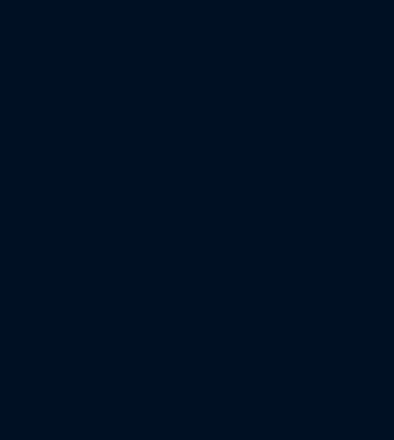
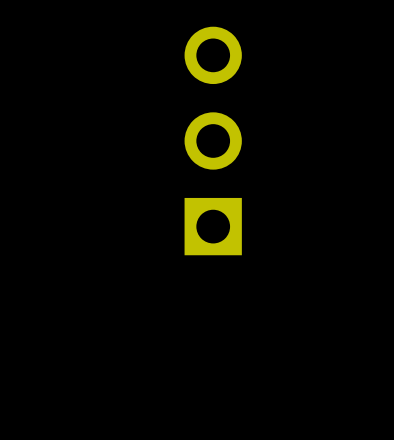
part: none -> (213, 140)

